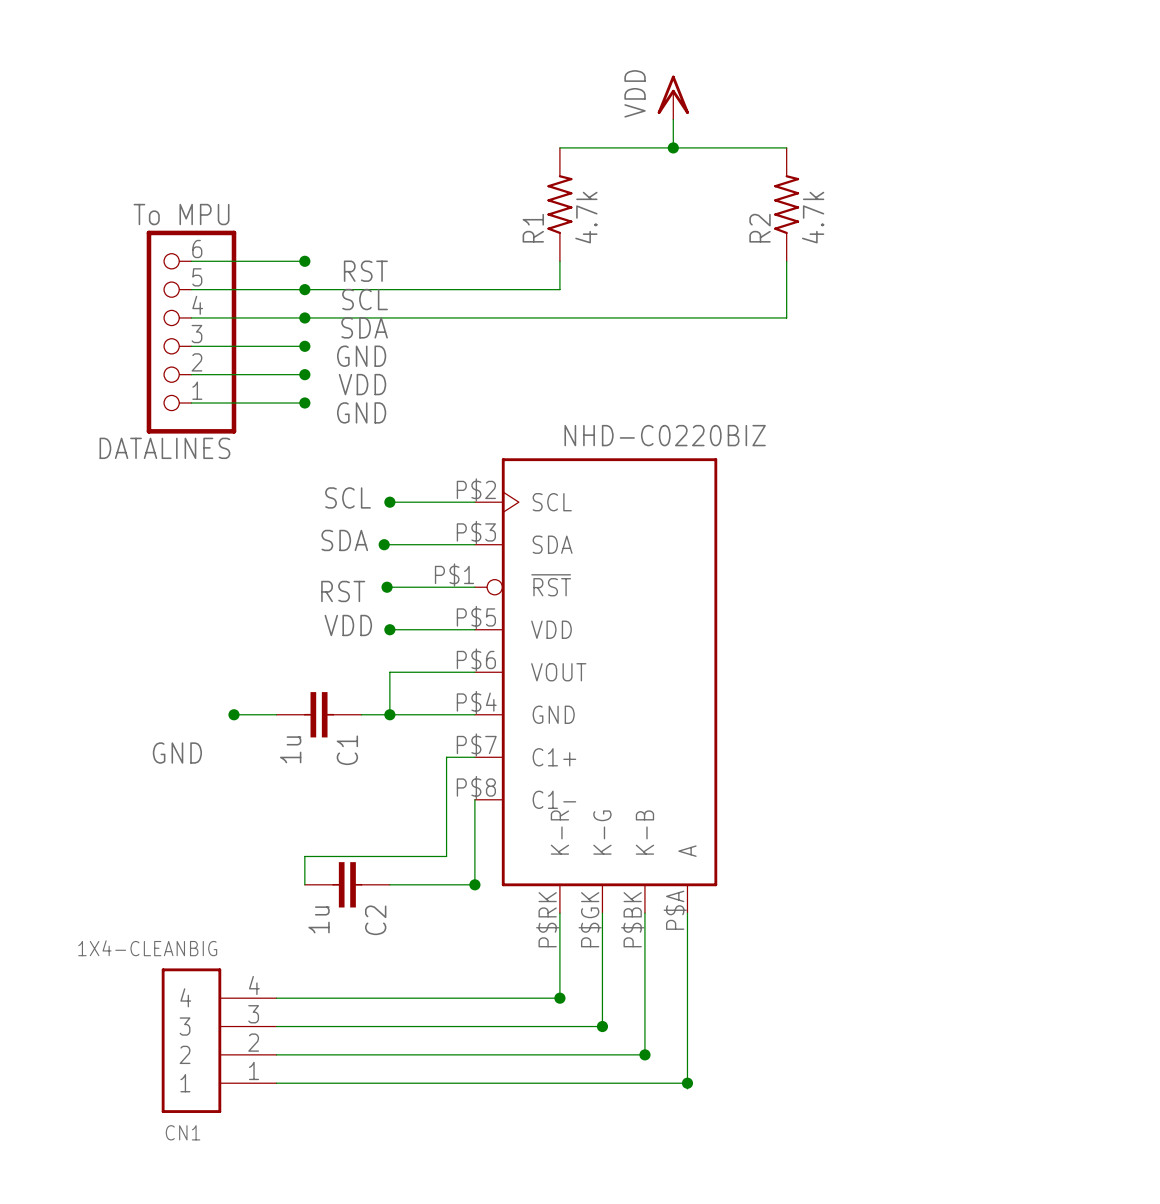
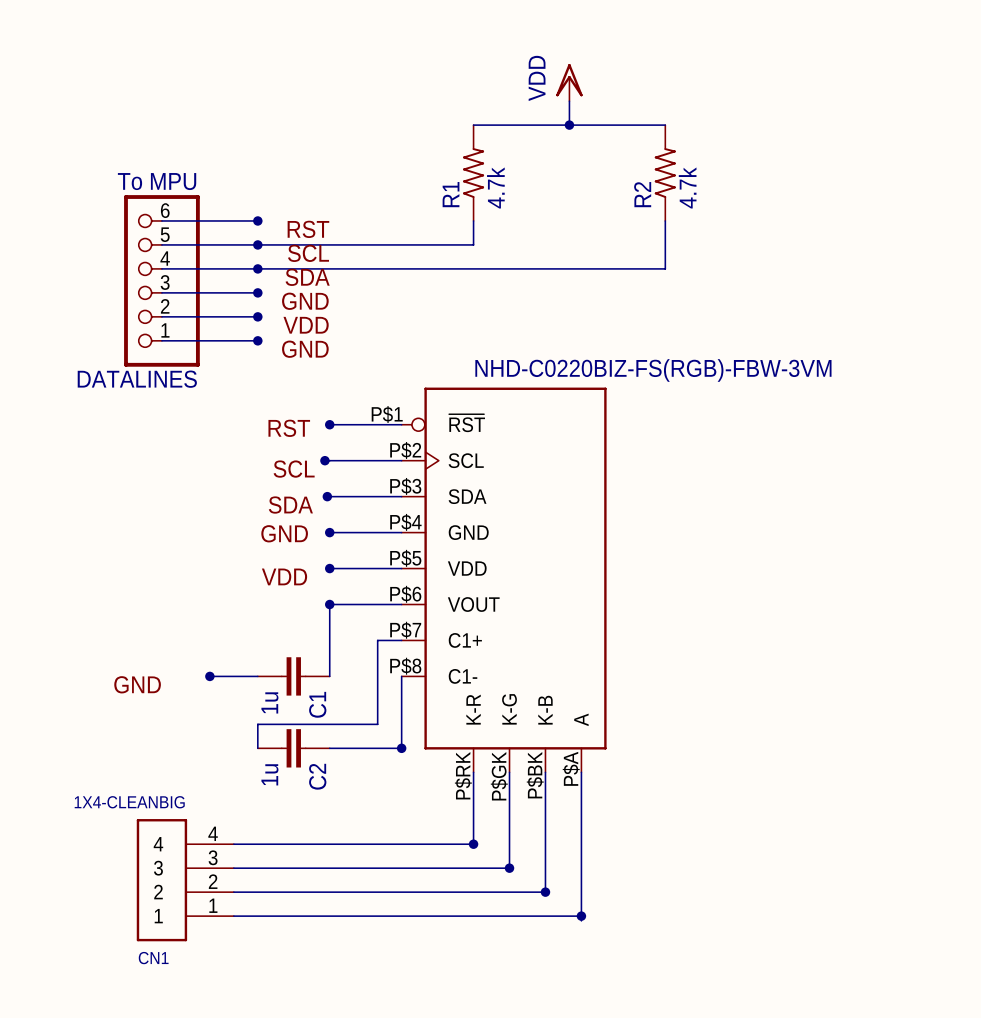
part value: NHD-C0220BIZ (665, 435) -> NHD-C0220BIZ-FS(RGB)-FBW-3VM (653, 370)
part symbol: [474, 458, 718, 914] -> [401, 387, 607, 773]
label position: SCL (348, 497) -> SCL (294, 469)
label position: SDA (344, 540) -> SDA (290, 505)
label position: RST (343, 591) -> RST (289, 428)
label position: VDD (348, 625) -> VDD (284, 576)
label: none -> GND (284, 533)
wire: (389, 672) (389, 714) (361, 714) -> none
junction: none -> (329, 568)
wire: (233, 714) (276, 714) -> none
junction: (233, 714) -> none
C1 position: (319, 714) -> (293, 676)
wire: none -> (329, 604) (329, 676)
label position: GND (177, 753) -> GND (137, 684)
wire: none -> (209, 676) (257, 676)
junction: none -> (209, 676)

